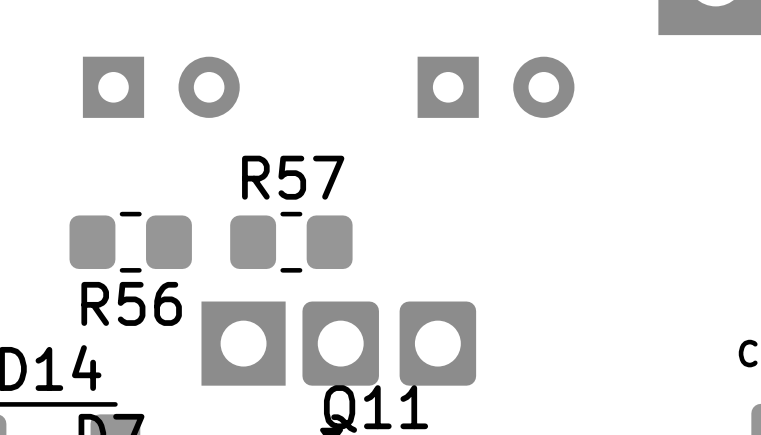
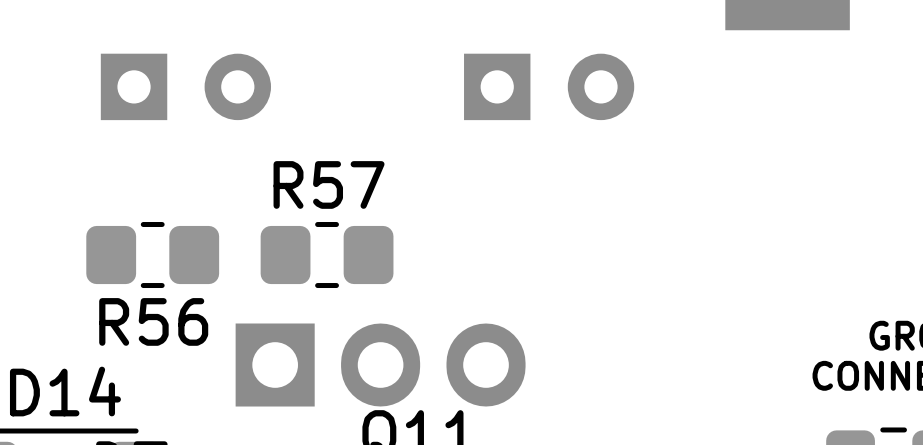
part footprint: [201, 301, 477, 386] -> [235, 323, 526, 407]

